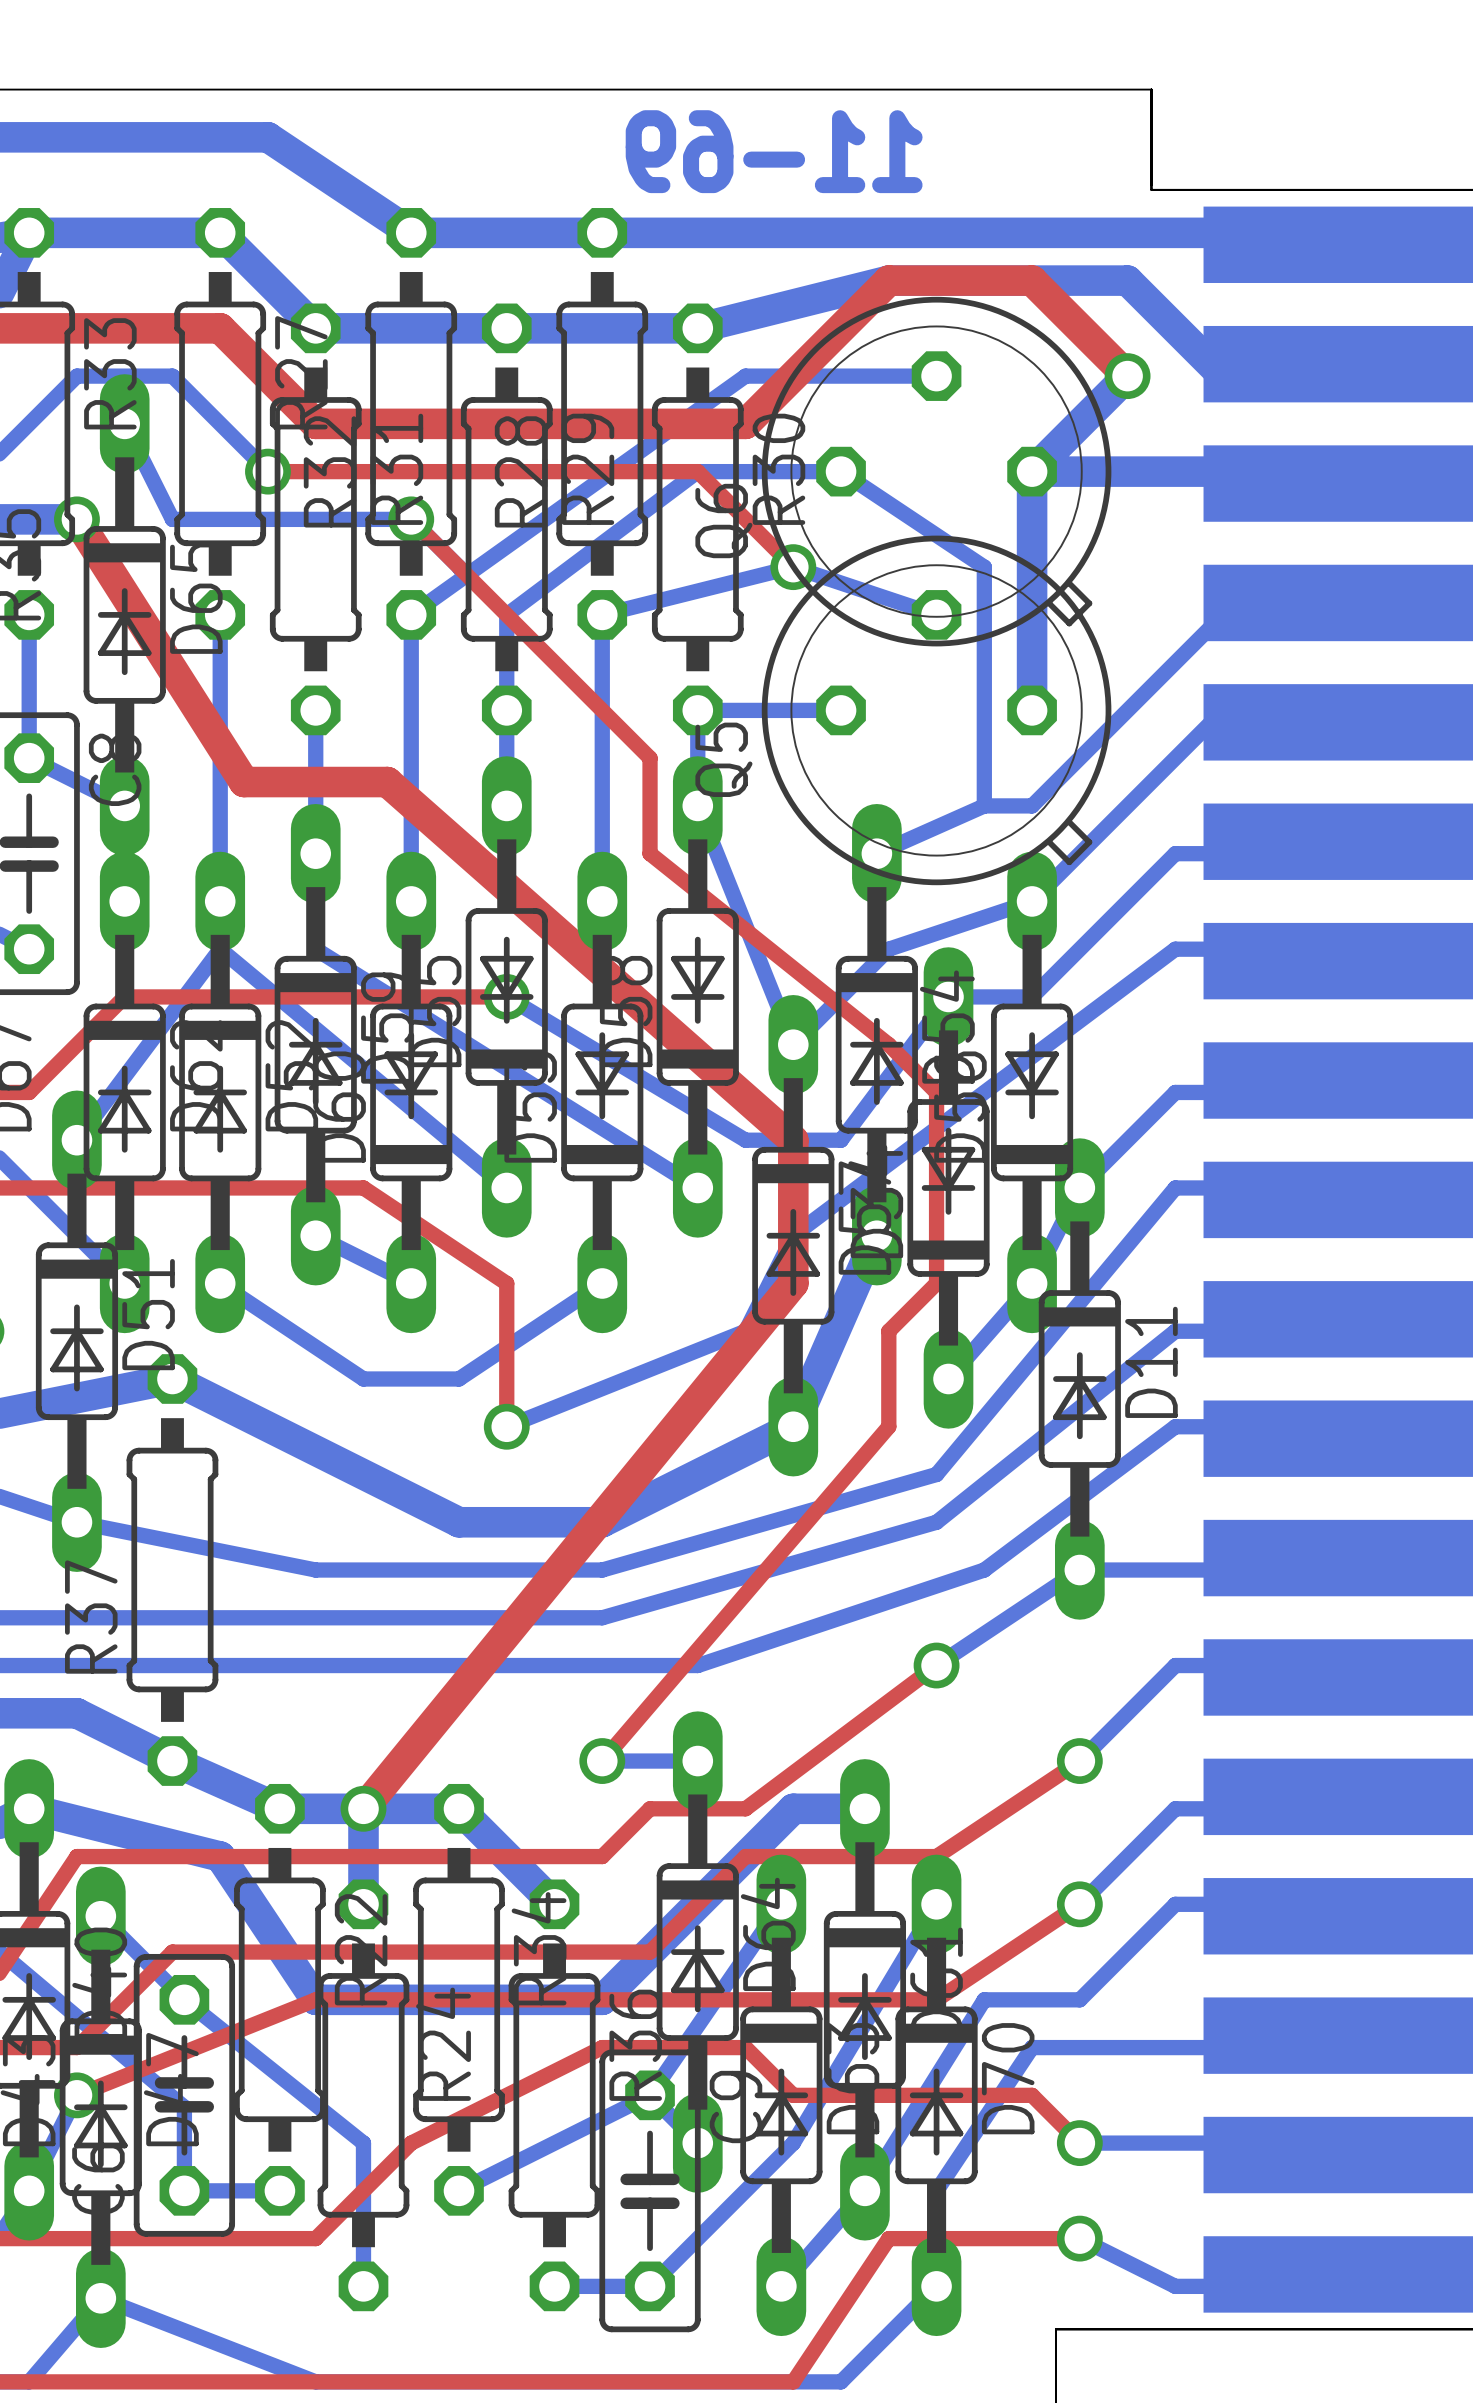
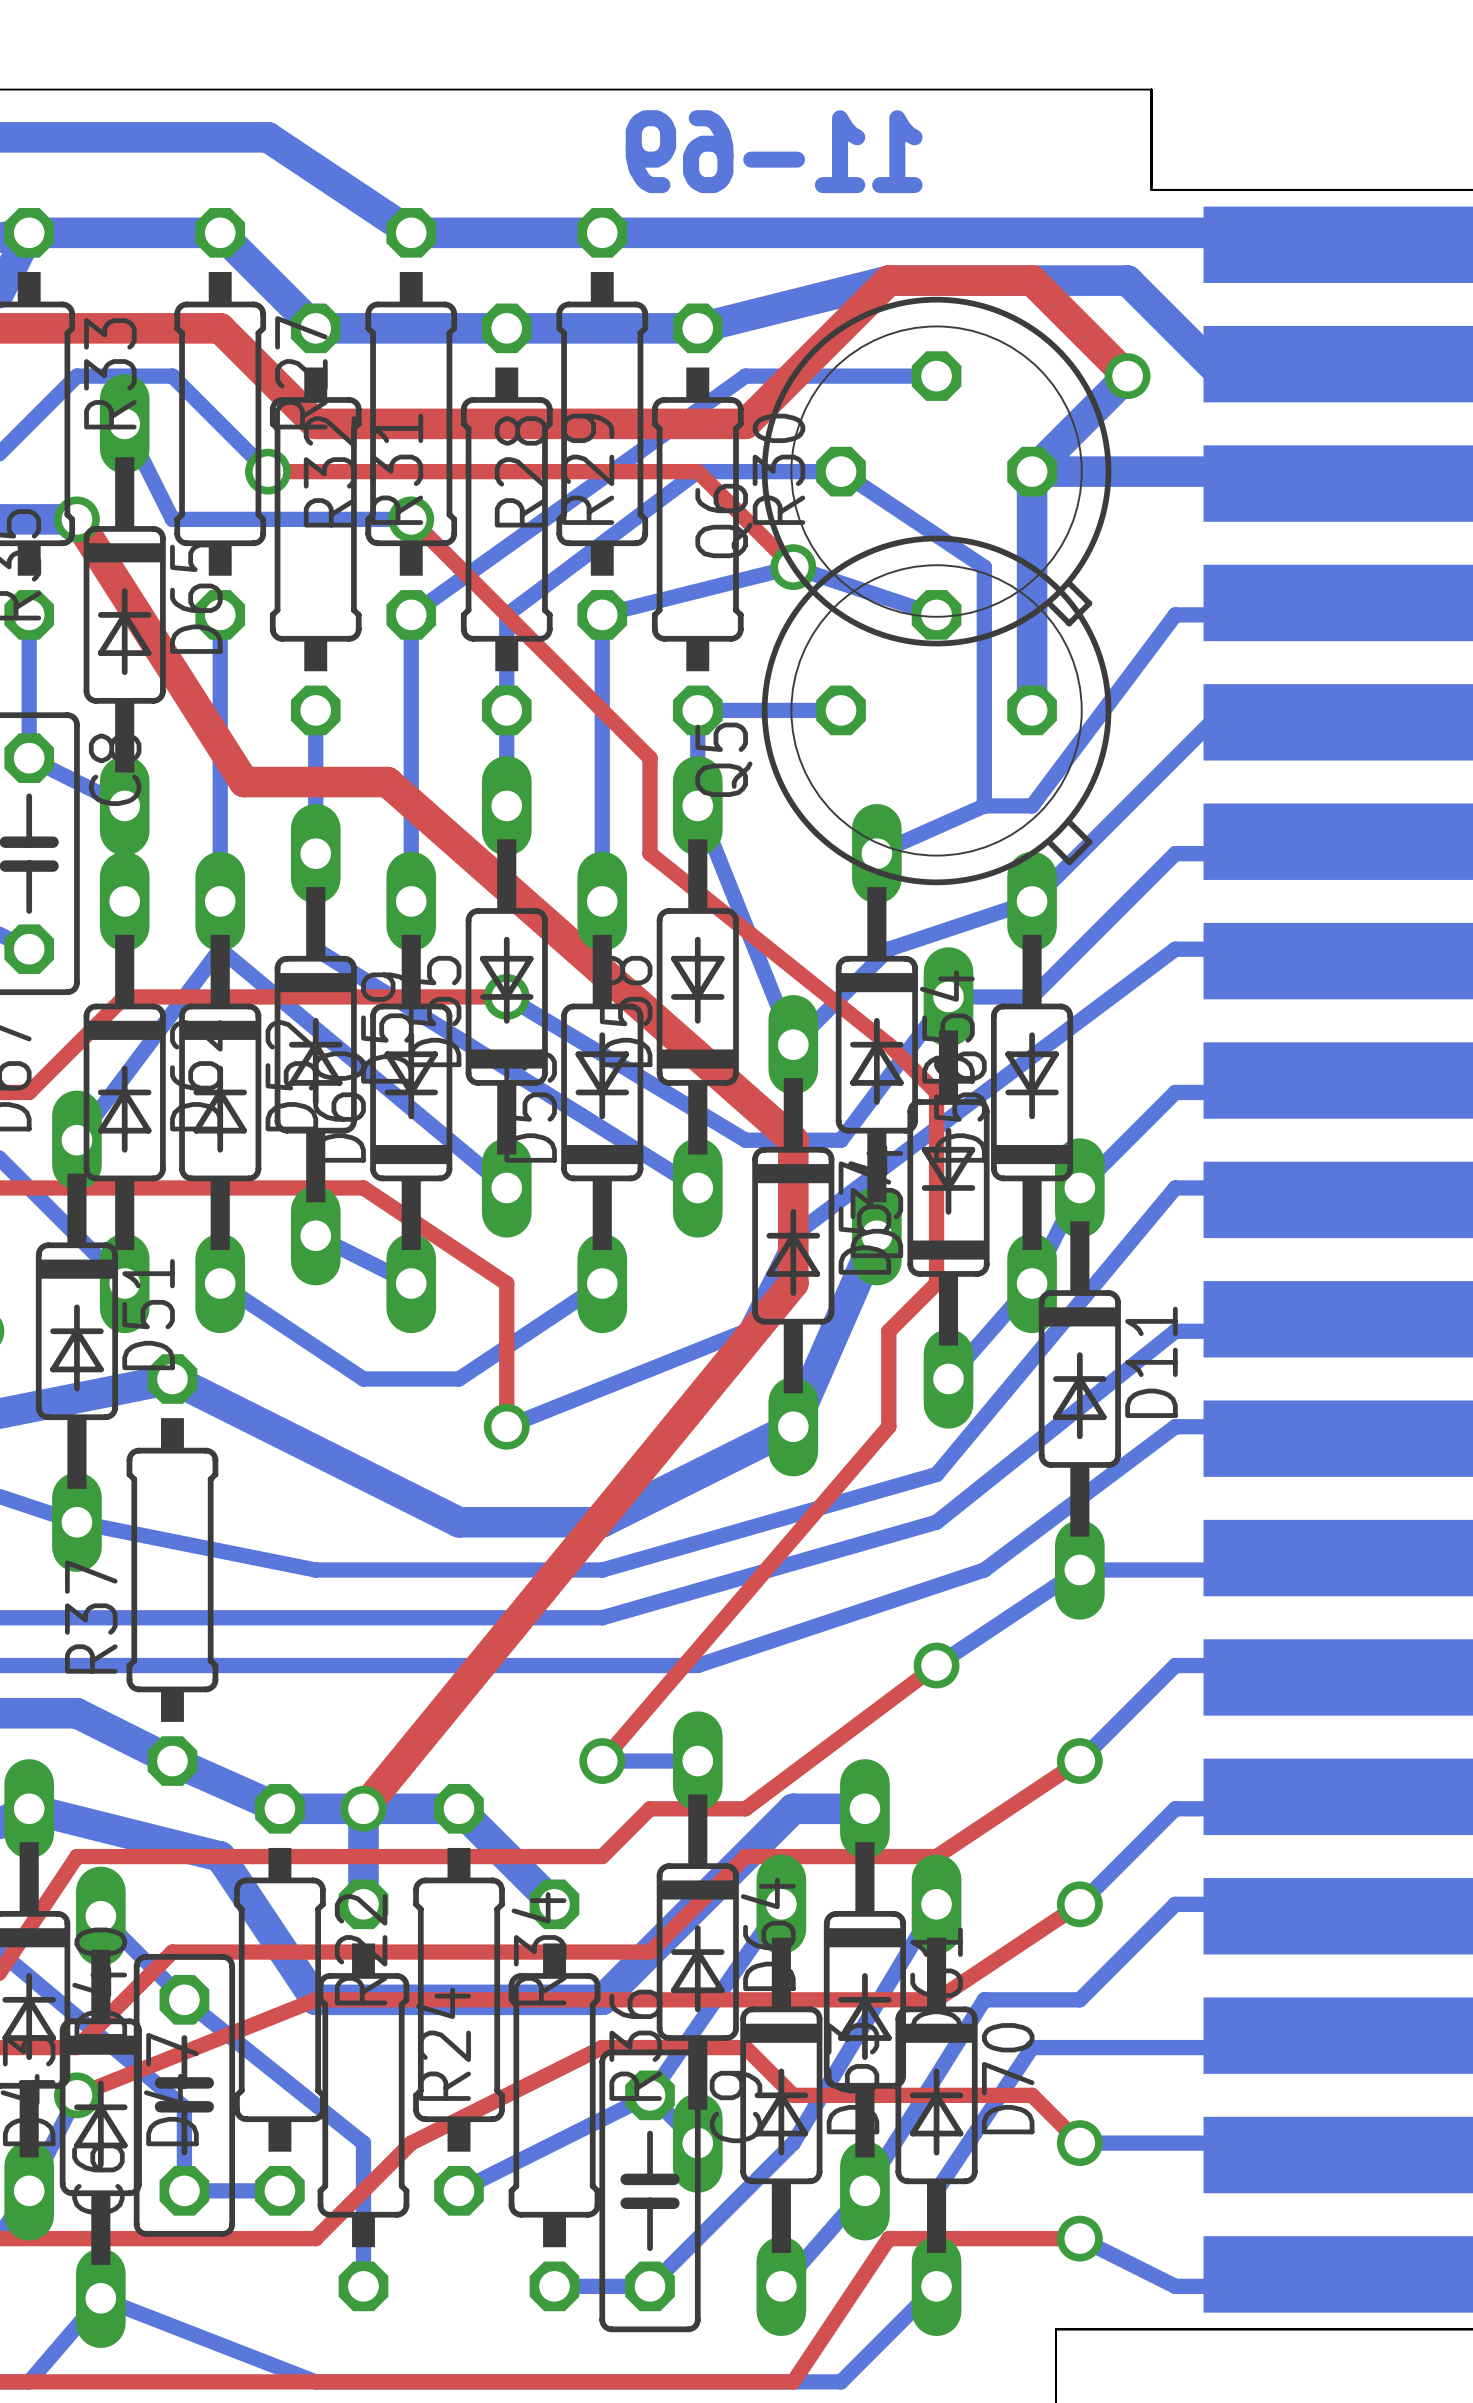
bottom track: (1223, 614) (1032, 805) -> (1223, 614) (1175, 614) (1032, 805)

